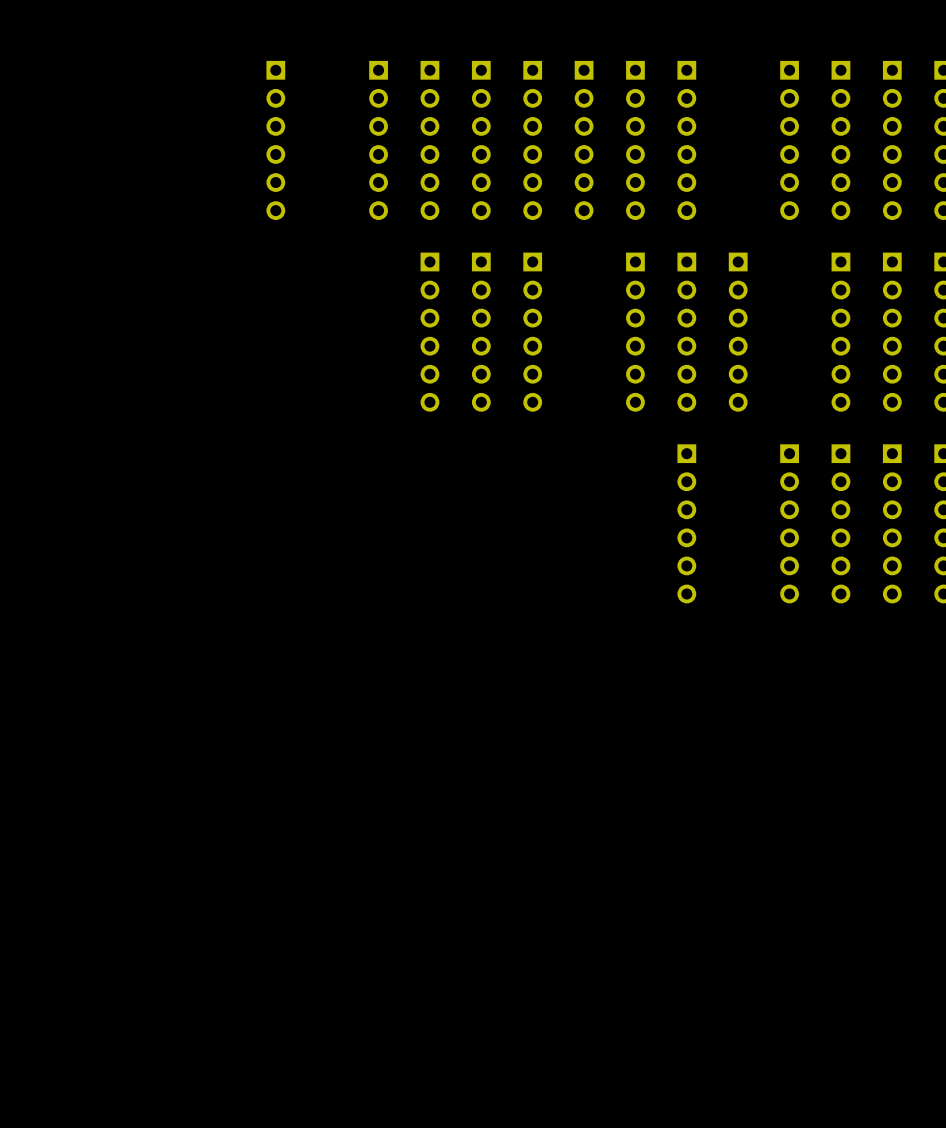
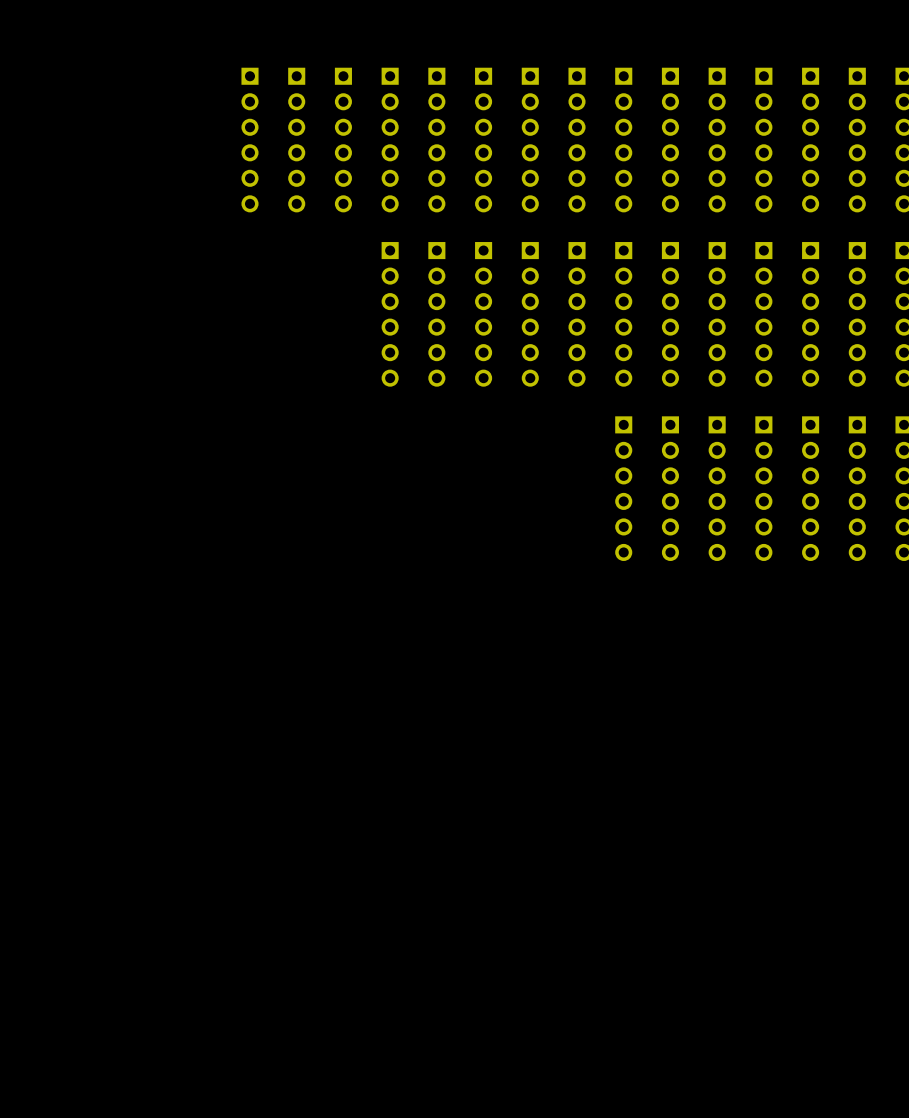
part: none -> (296, 140)
part: none -> (670, 140)
part: none -> (530, 314)
part: none -> (717, 314)
part: none -> (670, 488)

